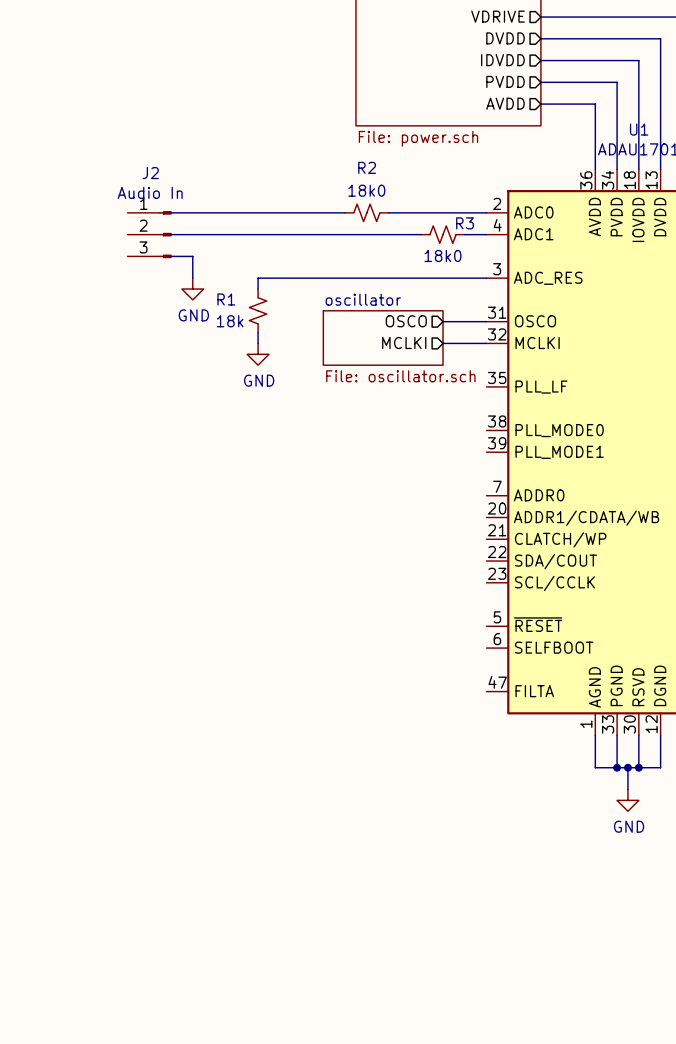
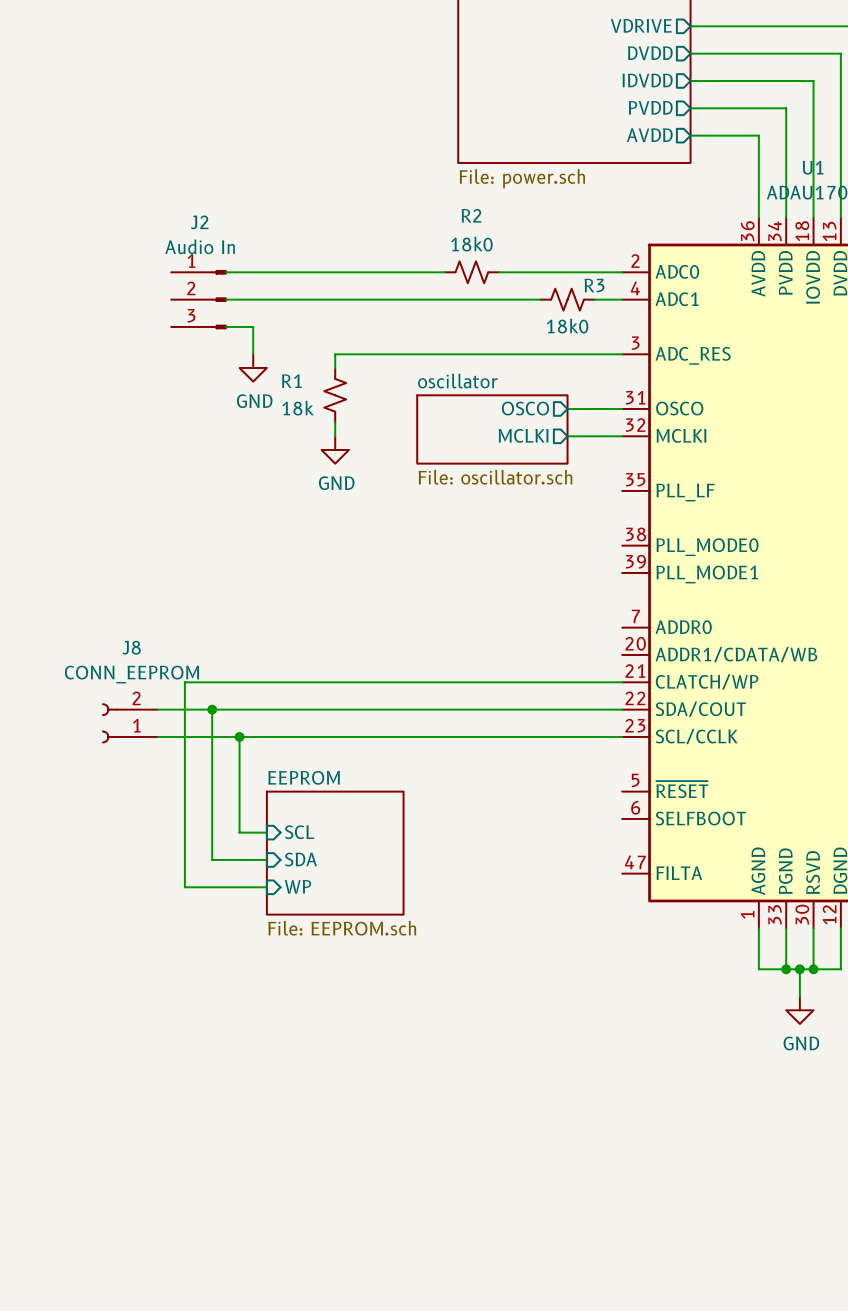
wire: none -> (622, 682) (184, 682) (184, 887) (266, 887)
wire: none -> (157, 709) (622, 709)
wire: none -> (212, 709) (212, 859) (266, 859)
junction: none -> (212, 709)
J8: none -> CONN_EEPROM (129, 723)
wire: none -> (157, 736) (622, 736)
wire: none -> (239, 736) (239, 832) (266, 832)
junction: none -> (239, 736)
sheet pin: none -> SCL (299, 832)
sheet EEPROM: none -> File: EEPROM.sch (335, 853)
sheet pin: none -> SDA (300, 859)
sheet pin: none -> WP (297, 886)

